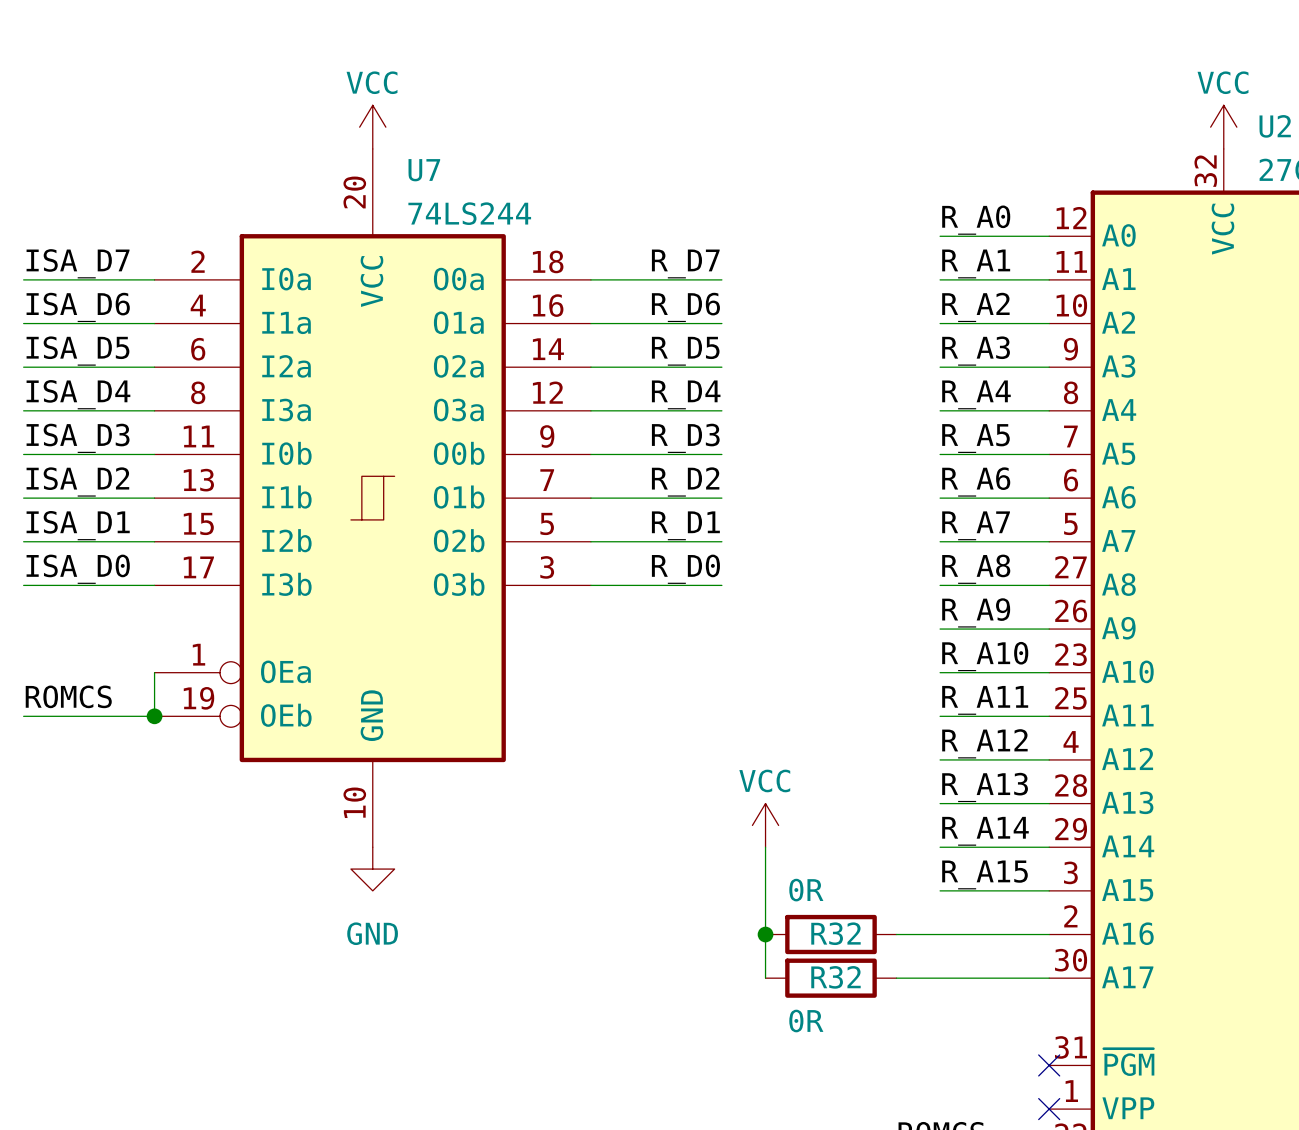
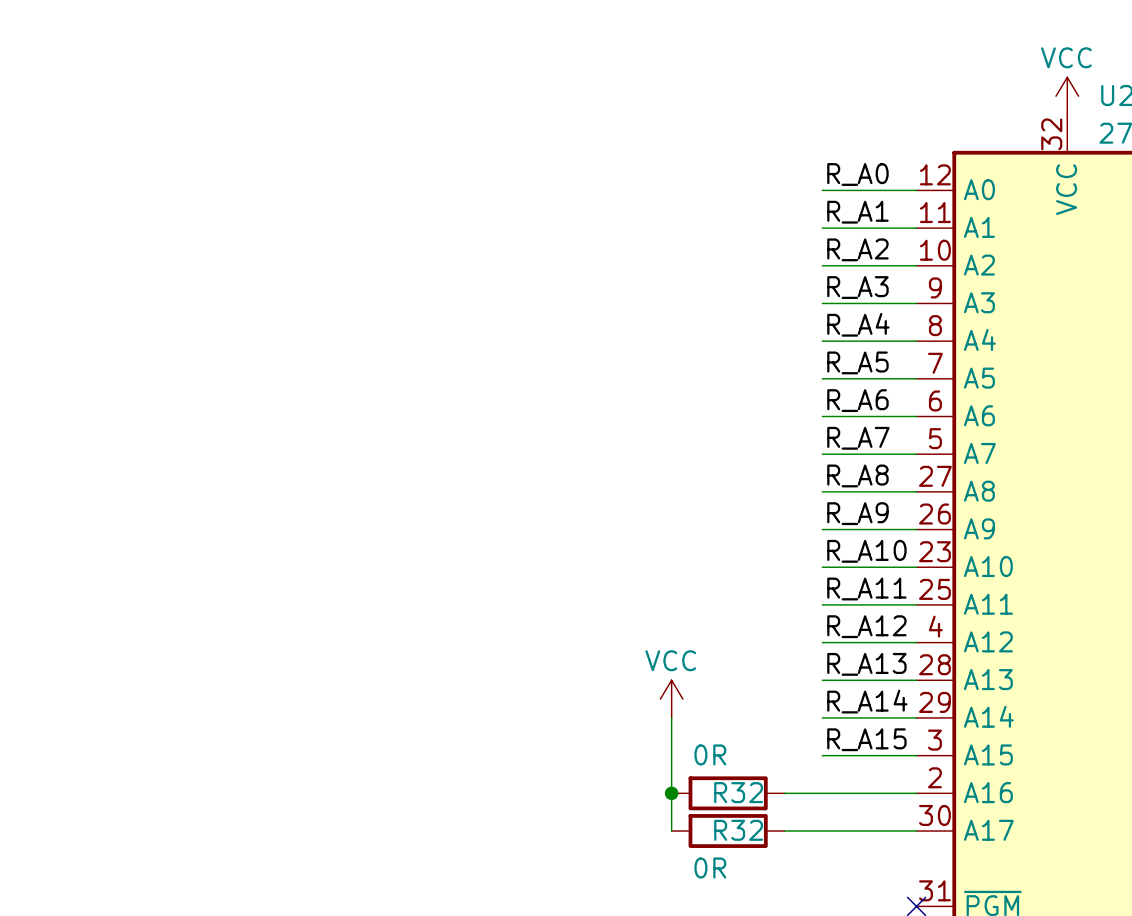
power symbol: VCC (372, 127) -> none
label: ISA_D7 (78, 263) -> none
label: R_D7 (685, 263) -> none
wire: (23, 279) (154, 279) -> none
wire: (590, 279) (721, 279) -> none
label: ISA_D6 (78, 307) -> none
label: R_D6 (685, 307) -> none
wire: (23, 323) (154, 323) -> none
wire: (590, 323) (721, 323) -> none
label: ISA_D5 (77, 351) -> none
label: R_D5 (685, 351) -> none
wire: (23, 367) (154, 367) -> none
wire: (590, 367) (721, 367) -> none
label: ISA_D4 (78, 394) -> none
label: R_D4 (686, 394) -> none
wire: (23, 410) (154, 410) -> none
wire: (590, 410) (721, 410) -> none
label: ISA_D3 (78, 438) -> none
label: R_D3 (685, 438) -> none
wire: (23, 454) (154, 454) -> none
wire: (590, 454) (721, 454) -> none
label: ISA_D2 (77, 481) -> none
label: R_D2 (685, 481) -> none
wire: (23, 498) (154, 498) -> none
U7: 74LS244 (372, 498) -> none
wire: (590, 498) (721, 498) -> none
label: ISA_D1 (78, 525) -> none
label: R_D1 (685, 525) -> none
wire: (23, 541) (154, 541) -> none
wire: (590, 541) (721, 541) -> none
label: ISA_D0 (78, 569) -> none
label: R_D0 (685, 569) -> none
wire: (23, 585) (154, 585) -> none
wire: (590, 585) (721, 585) -> none
wire: (154, 672) (154, 716) (23, 716) -> none
label: ROMCS (68, 696) -> none
junction: (154, 716) -> none
power symbol: GND (372, 869) -> none

